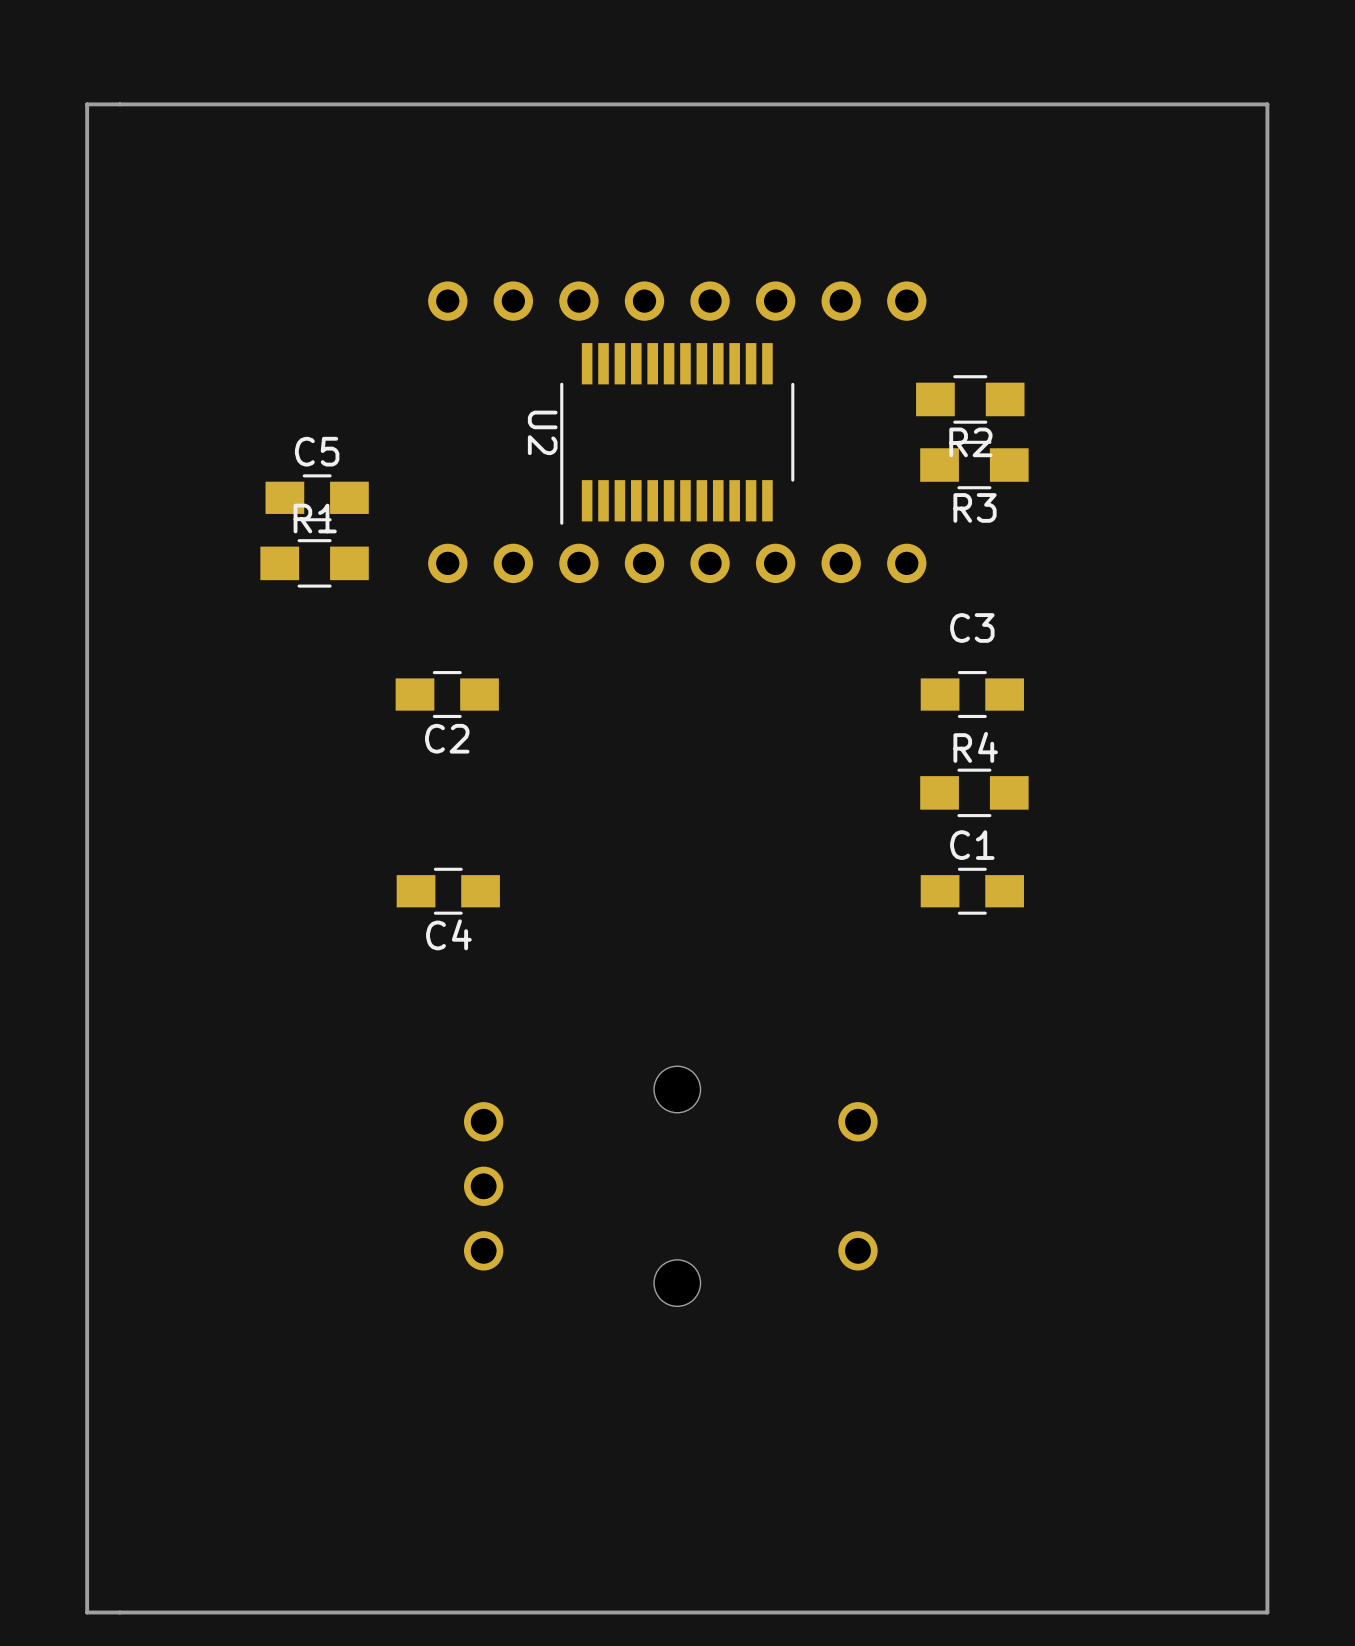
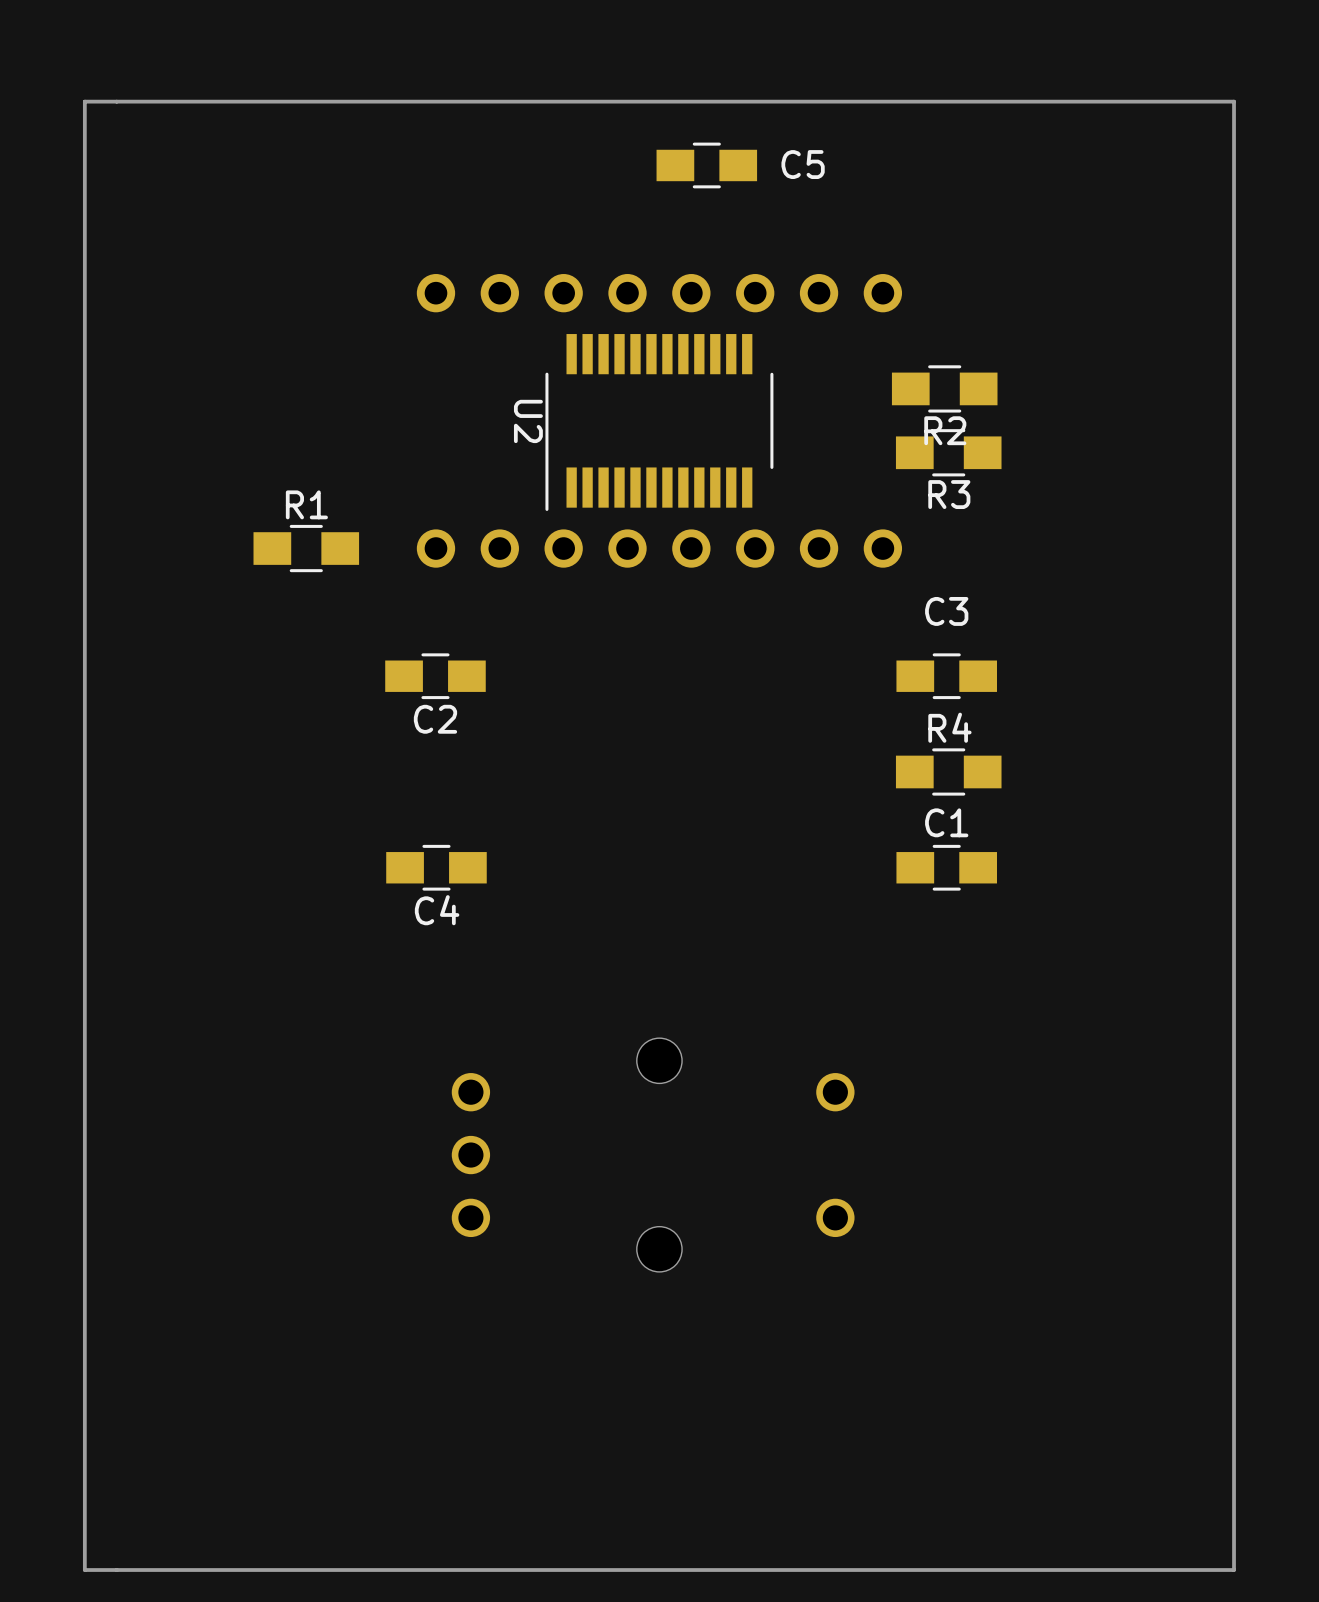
C5 name position: C5 (317, 451) -> C5 (803, 164)
C5 position: (317, 497) -> (706, 165)

